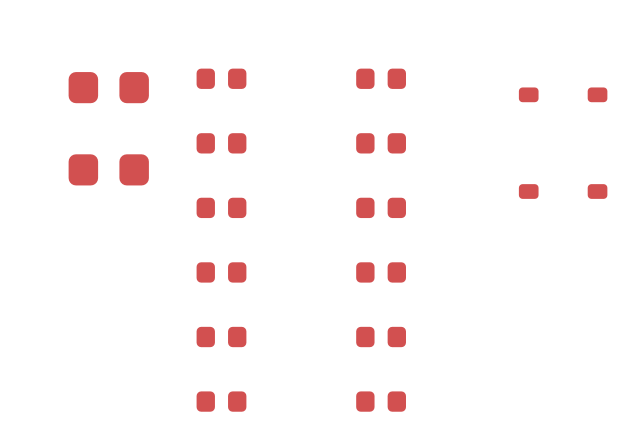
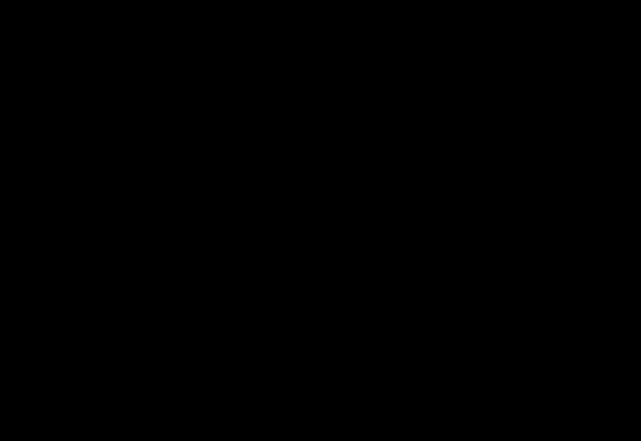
part: (221, 78) -> none
part: (381, 78) -> none
part: (108, 87) -> none
part: (563, 94) -> none
part: (221, 143) -> none
part: (381, 143) -> none
part: (108, 169) -> none
part: (563, 191) -> none
part: (221, 207) -> none
part: (381, 207) -> none
part: (221, 272) -> none
part: (381, 272) -> none
part: (221, 337) -> none
part: (381, 337) -> none
part: (221, 401) -> none
part: (381, 401) -> none

